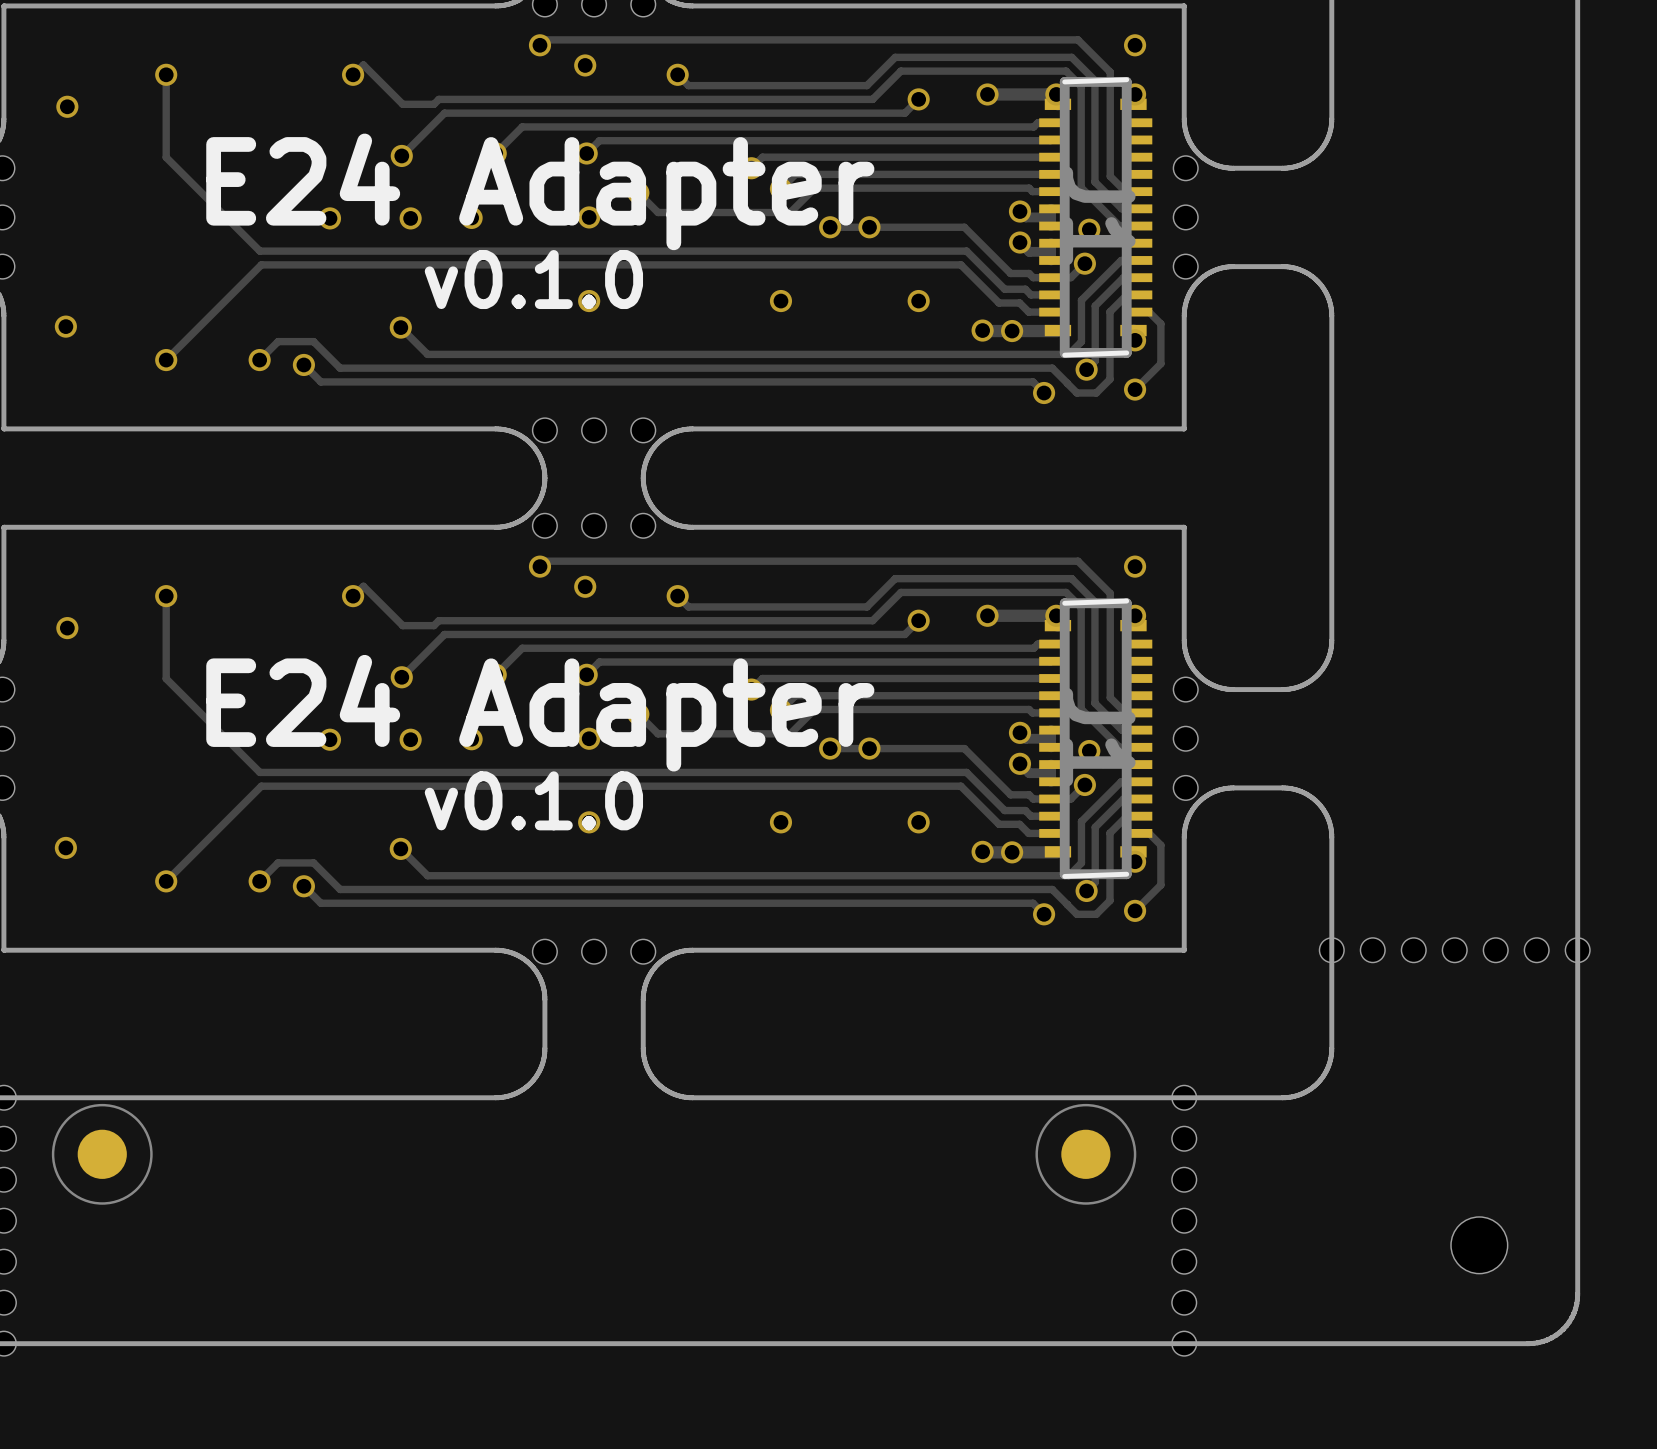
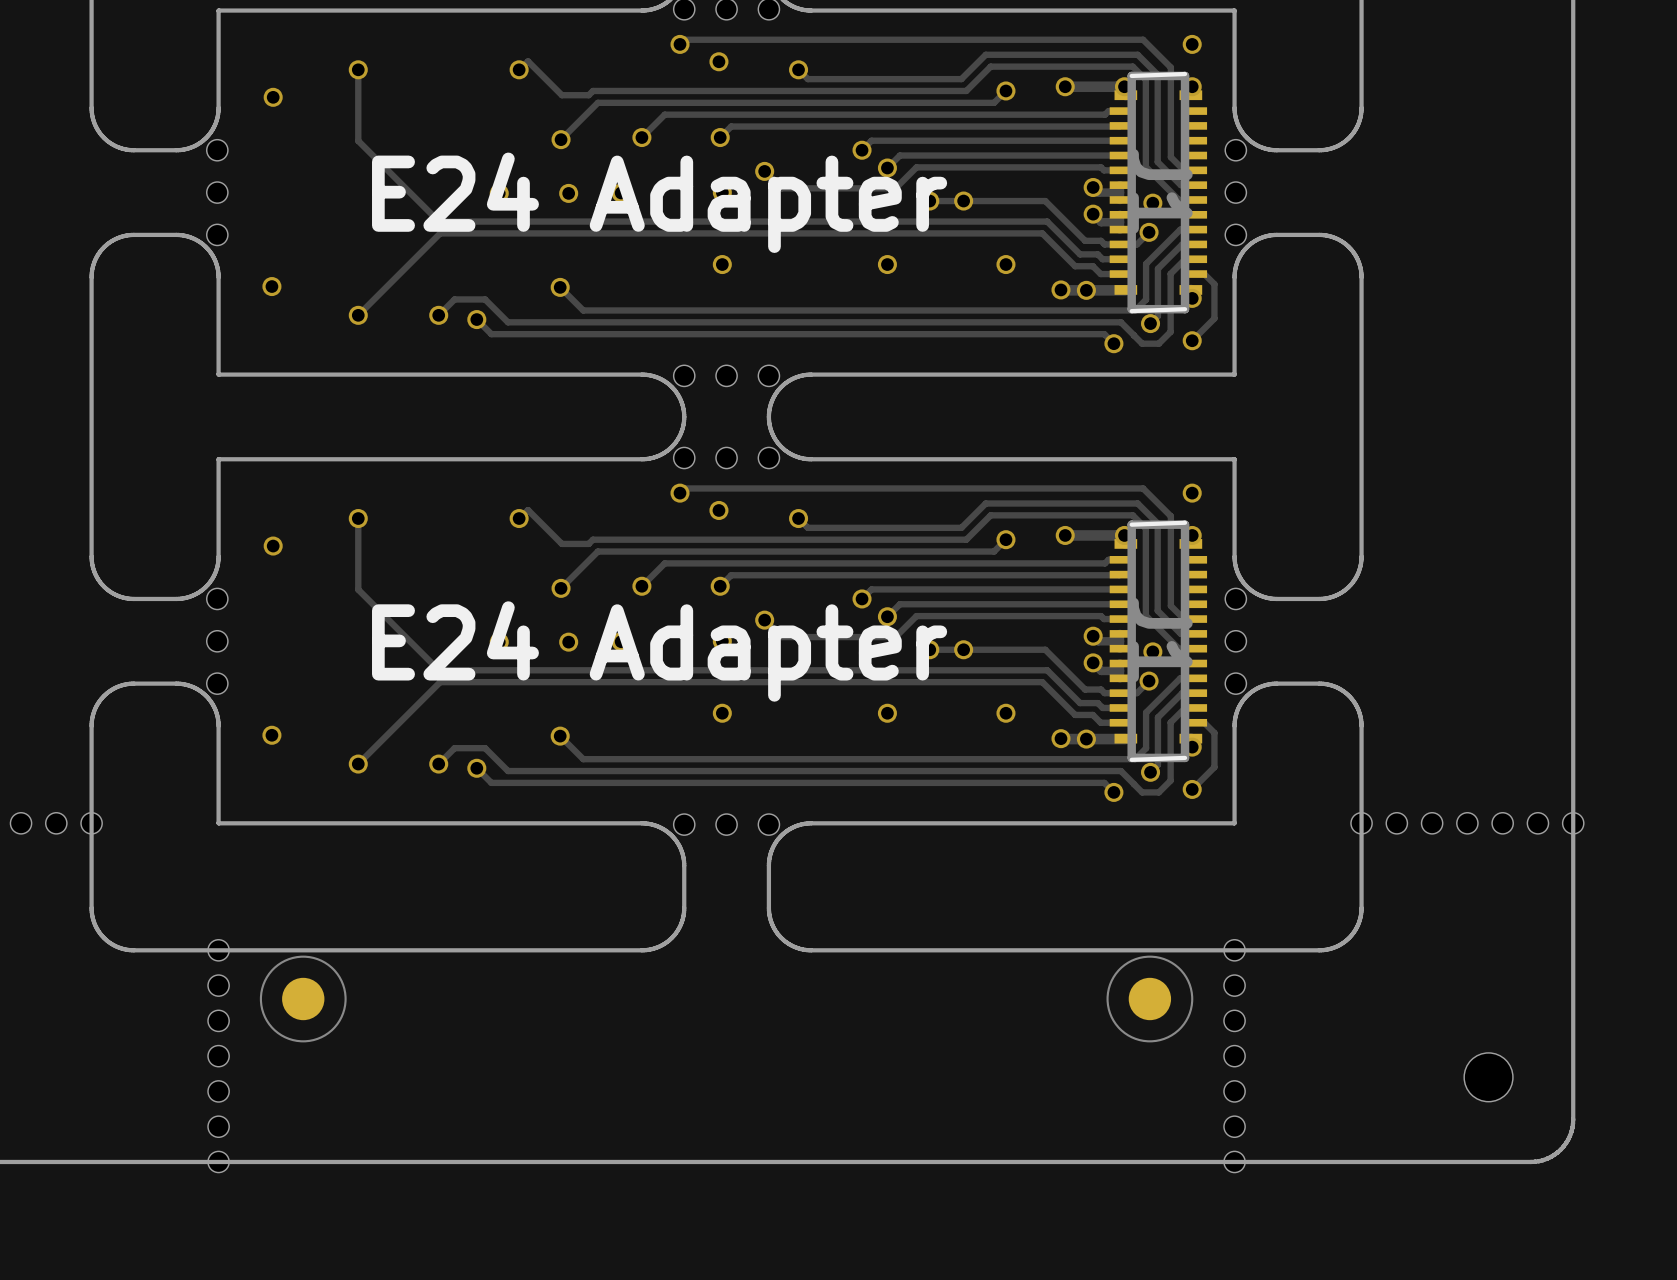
text position: E24 Adapter (540, 191) -> E24 Adapter (659, 202)
text: v0.1.0 (533, 279) -> none
text position: E24 Adapter (540, 713) -> E24 Adapter (659, 651)
text: v0.1.0 (533, 800) -> none

